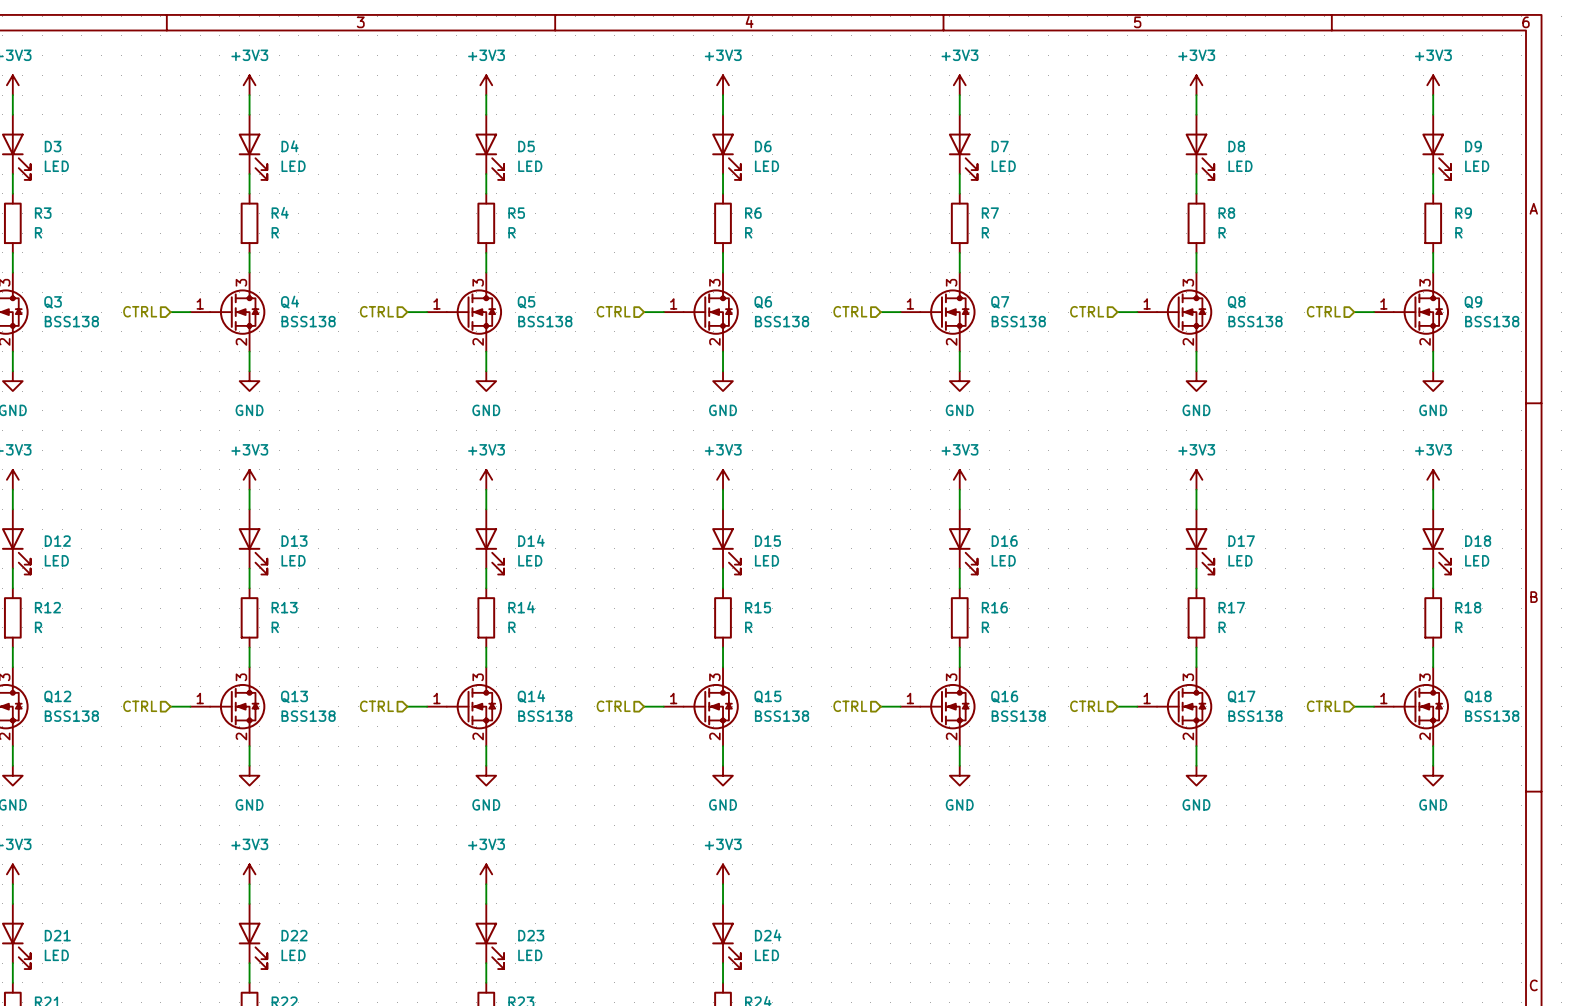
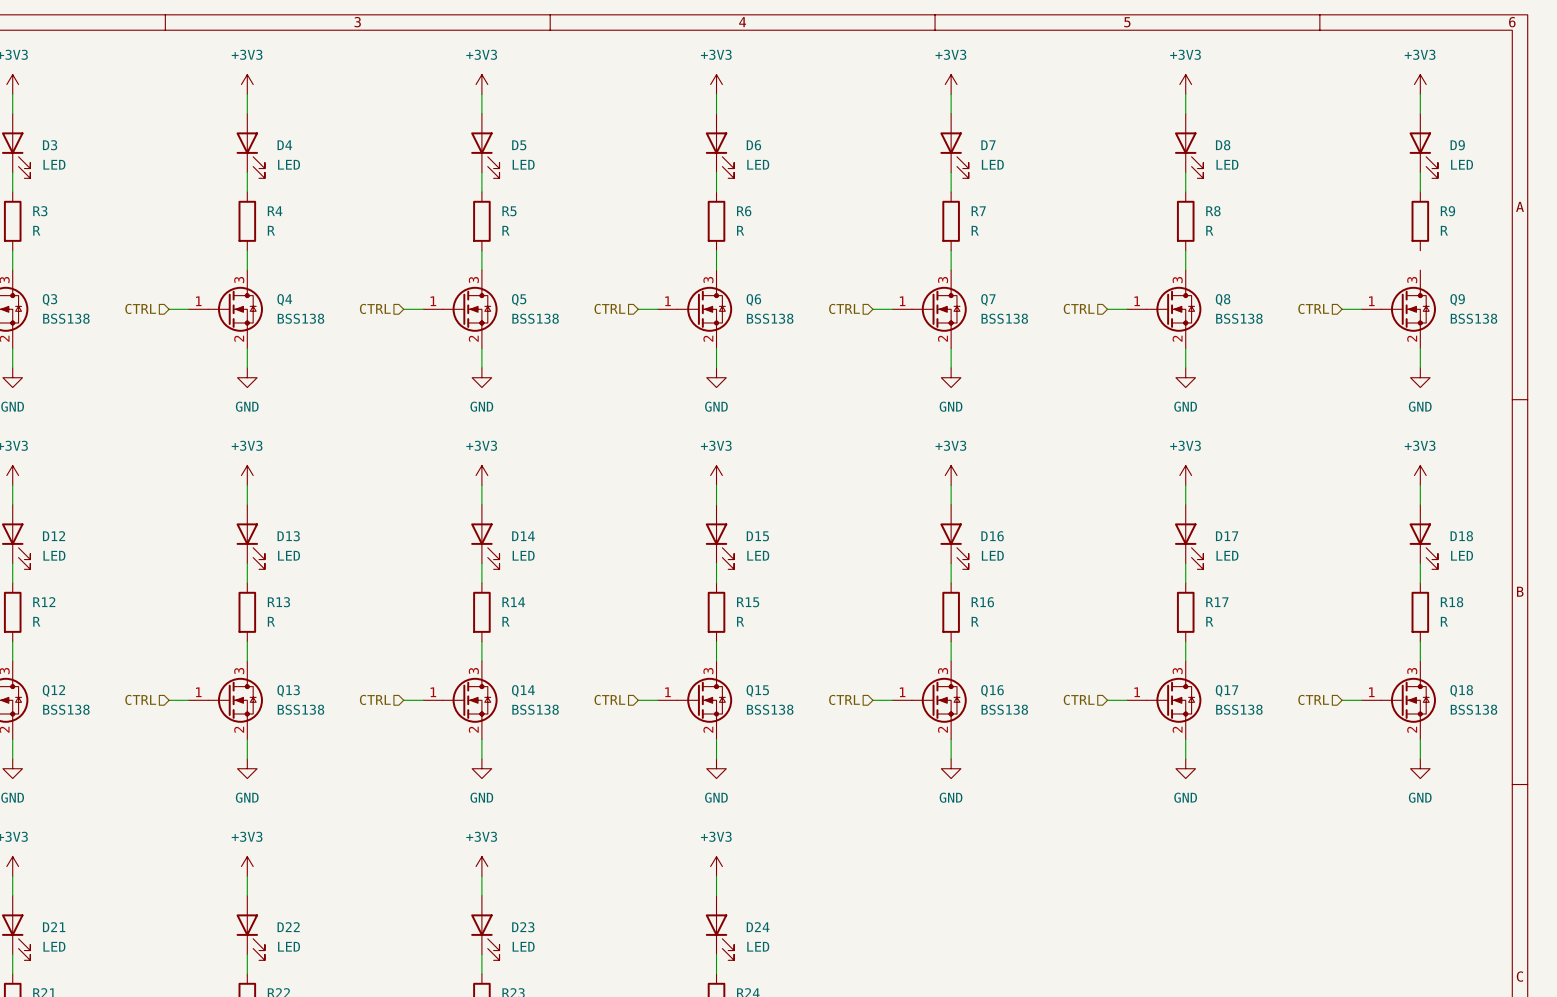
wire: (1433, 252) (1433, 272) -> none

